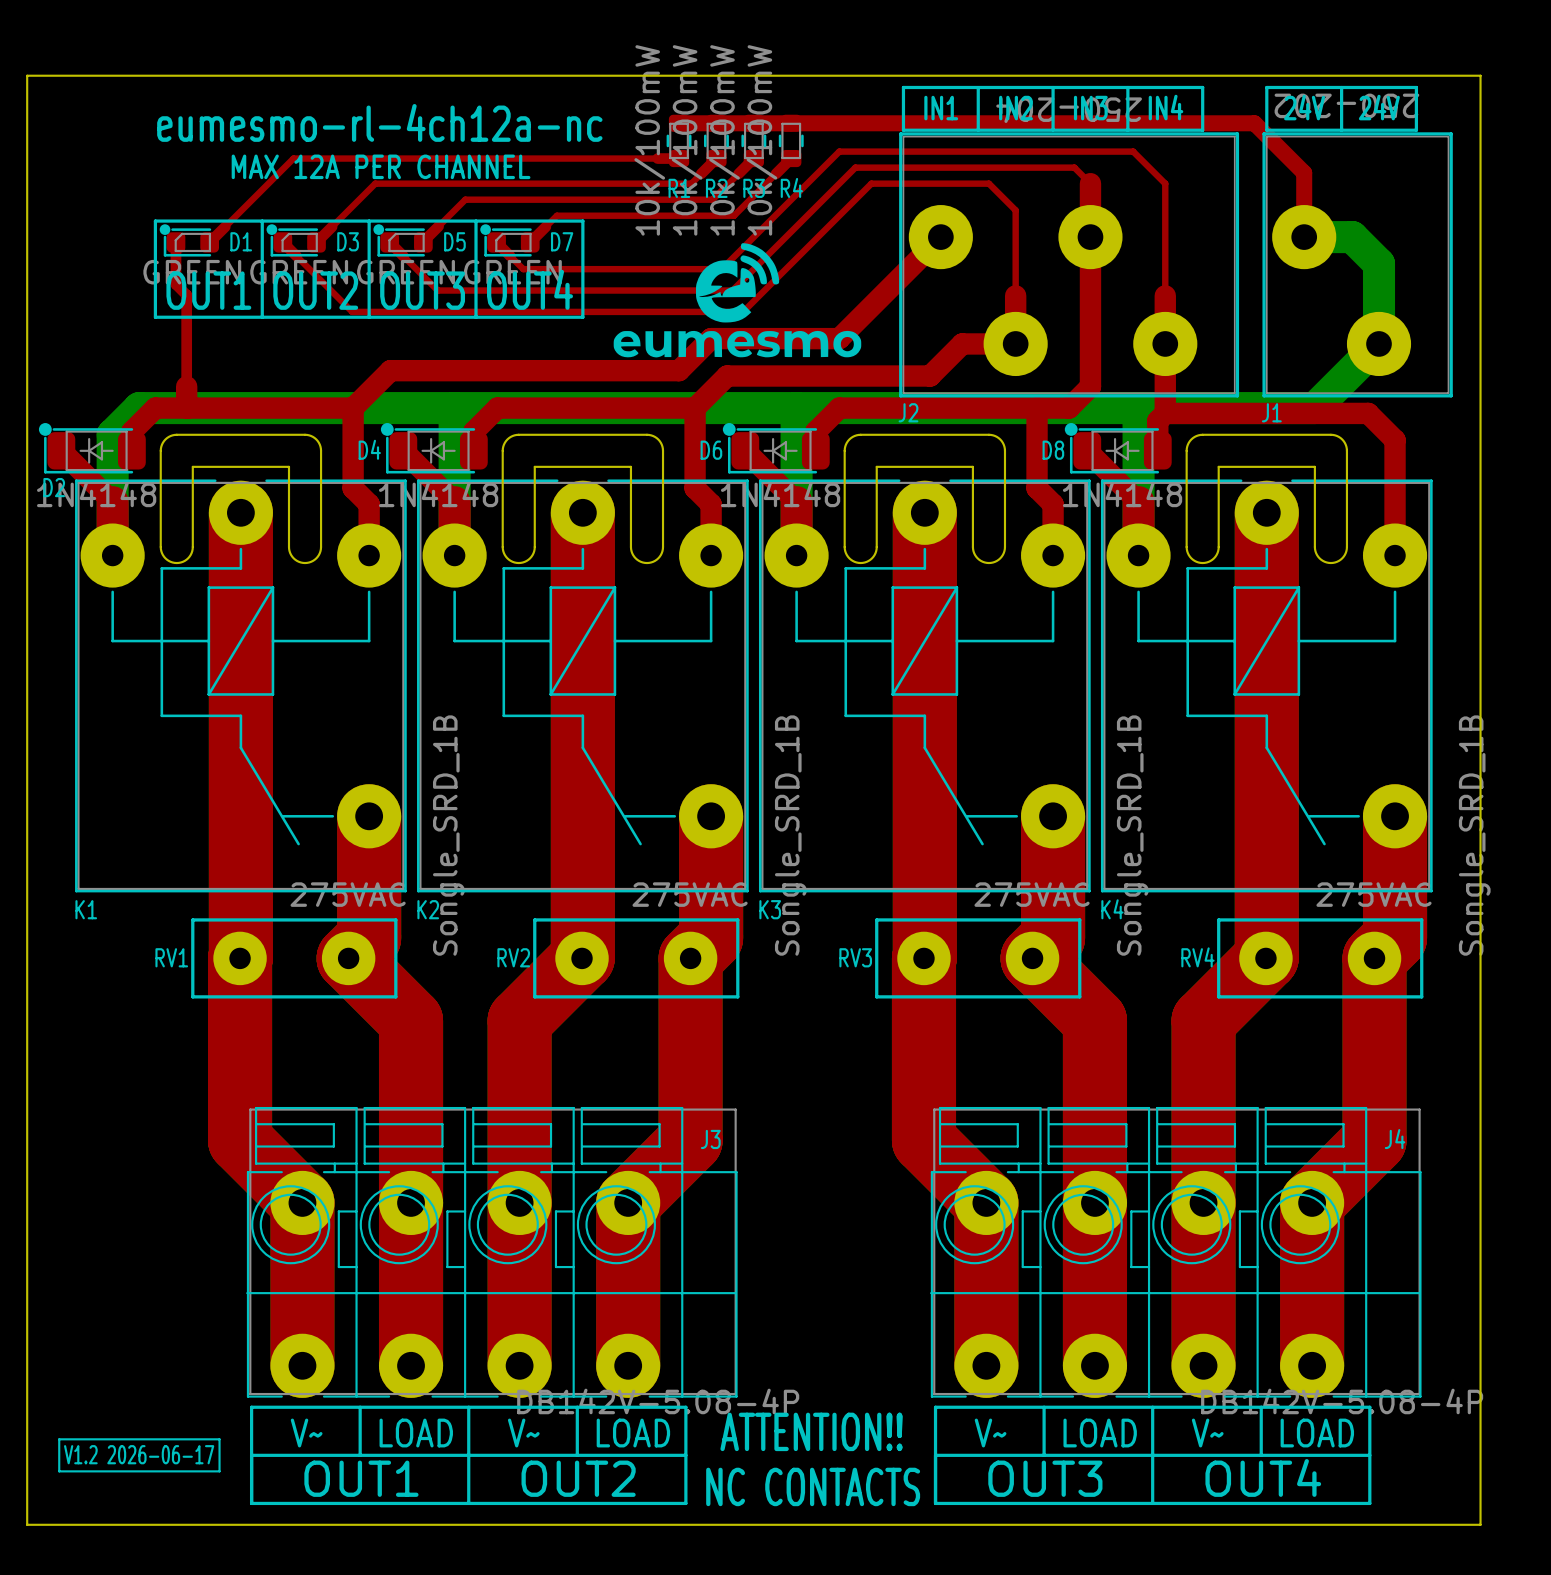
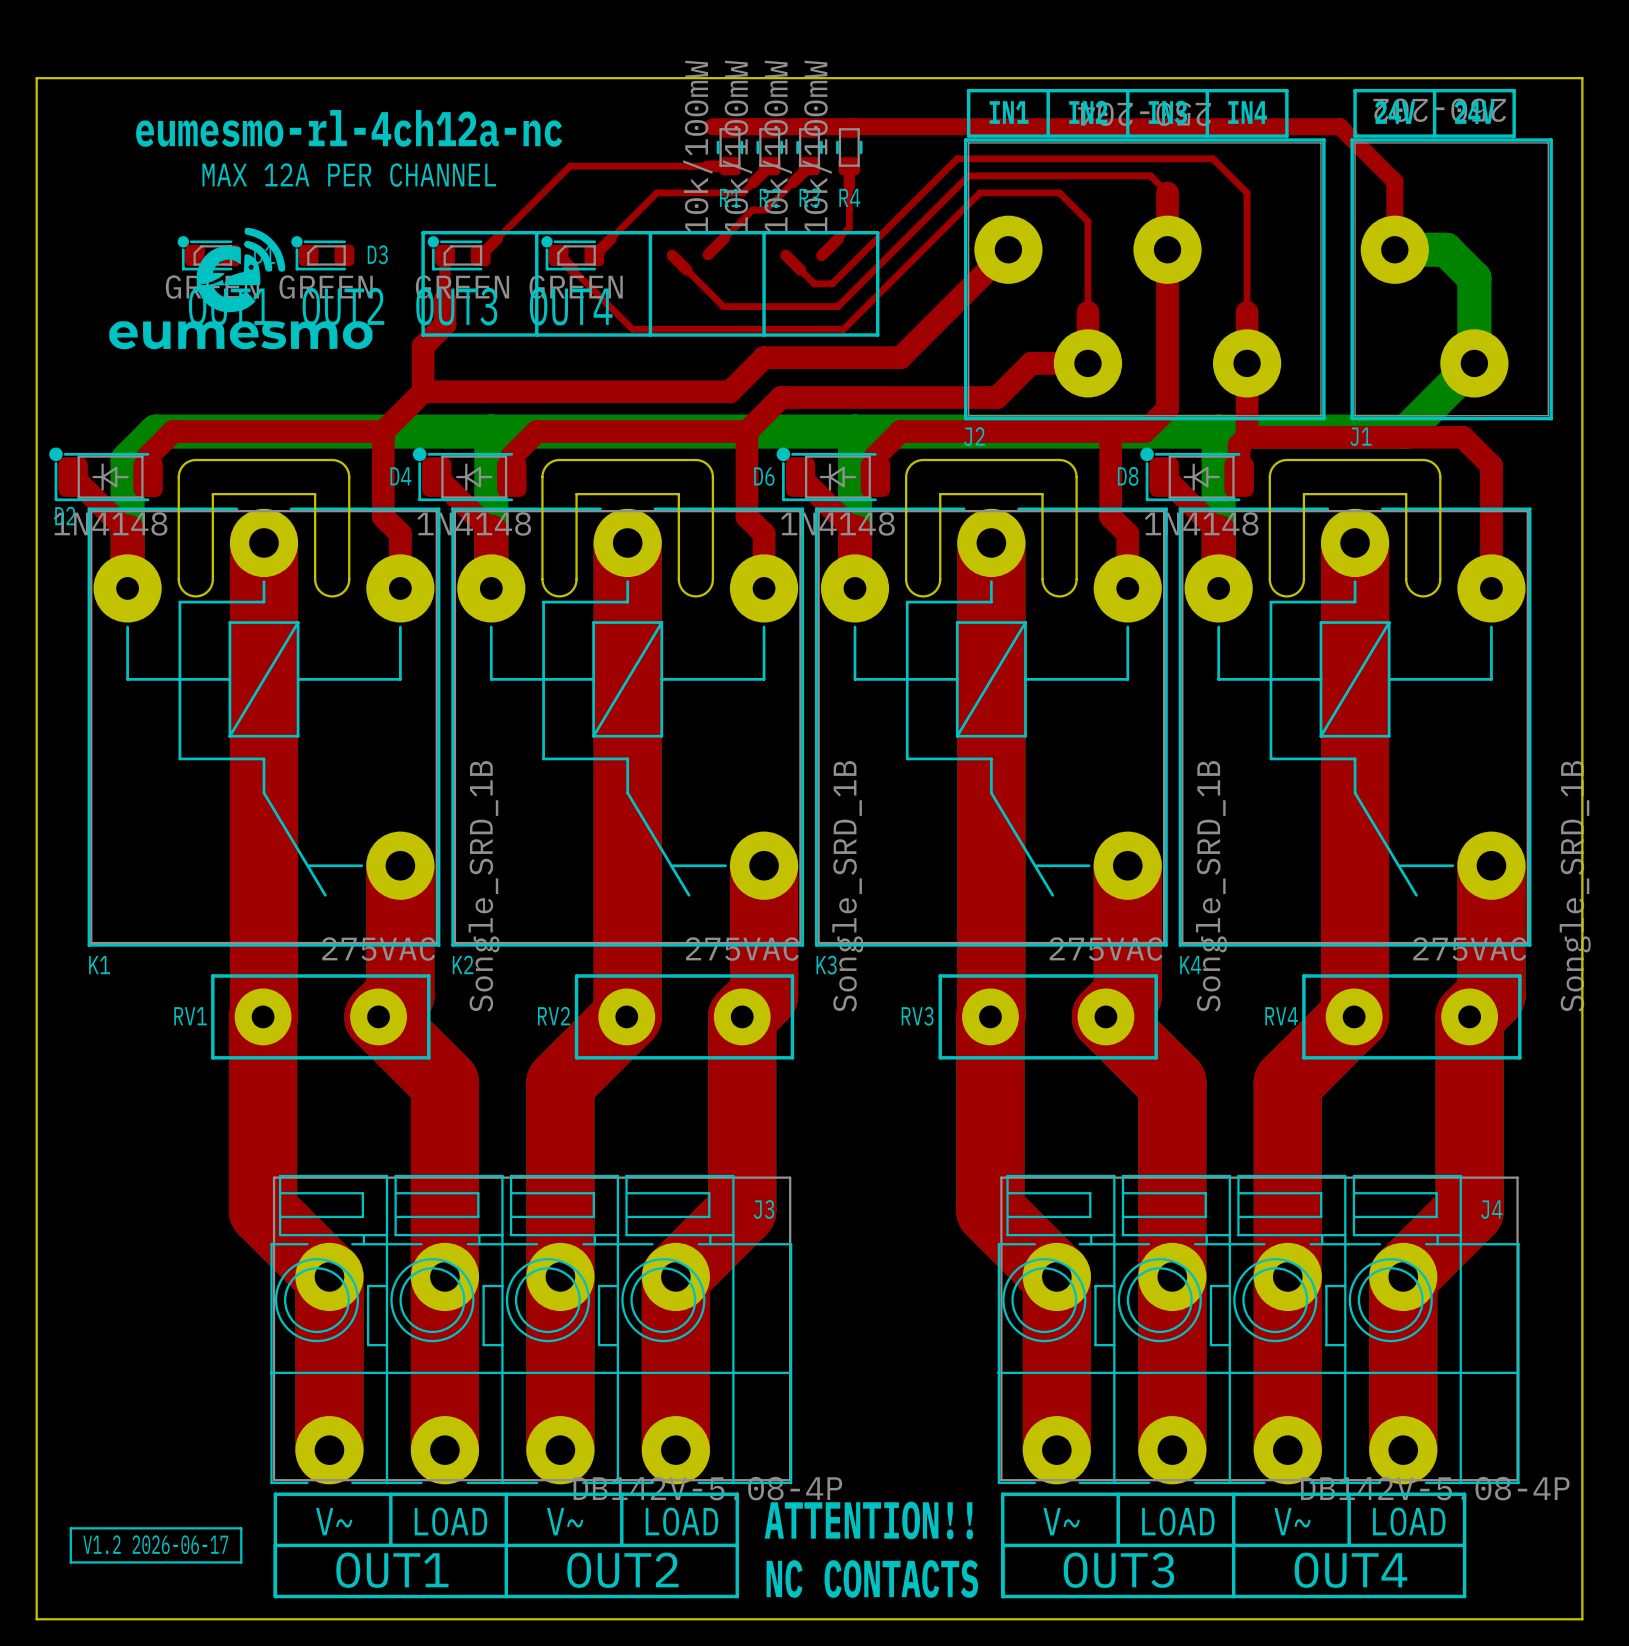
text position: eumesmo-rl-4ch12a-nc (379, 122) -> eumesmo-rl-4ch12a-nc (349, 128)
top track: (679, 123) (1254, 123) -> (712, 126) (1340, 126) (1341, 128)
top track: (892, 151) (839, 151) (721, 269) (523, 269) (496, 242) -> (957, 158) (832, 283) (814, 283) (785, 255)
top track: (528, 158) (293, 158) (209, 242) -> (570, 166) (480, 255)
top track: (791, 158) (734, 215) (556, 215) (530, 242) -> none
top track: none -> (849, 168) (849, 227) (821, 255)
text position: MAX 12A PER CHANNEL (381, 166) -> MAX 12A PER CHANNEL (349, 175)
top track: (903, 167) (855, 167) (732, 290) -> (968, 175) (837, 306) (786, 306)
top track: (610, 183) (375, 183) (316, 242) -> (656, 192) (594, 255)
top track: (914, 183) (871, 183) (743, 311) -> (980, 192) (843, 329) (798, 329)
top track: (700, 199) (465, 199) (423, 242) -> (752, 209) (708, 255)
line: (262, 221) (262, 317) -> (764, 232) (764, 335)
line: (369, 221) (369, 317) -> (536, 232) (536, 335)
line: (390, 221) (155, 221) (155, 317) (390, 317) -> (423, 232) (423, 335)
line: (476, 221) (476, 317) -> (650, 232) (650, 335)
line: (582, 221) (582, 317) -> (627, 232) (877, 232) (877, 335) (627, 335)
D5 position: (403, 240) -> (459, 253)
D7 position: (509, 240) -> (572, 253)
D5 name: D5 (454, 241) -> none
D7 name: D7 (562, 241) -> none
top track: (175, 242) (175, 284) (186, 295) (187, 408) -> none
top track: (282, 242) (352, 311) (587, 311) -> (558, 255) (632, 329)
top track: (389, 242) (437, 290) (672, 290) -> (672, 255) (723, 306)
top track: none -> (444, 255) (444, 324) (423, 346) (423, 391)
drawing position: (737, 300) -> (240, 288)

